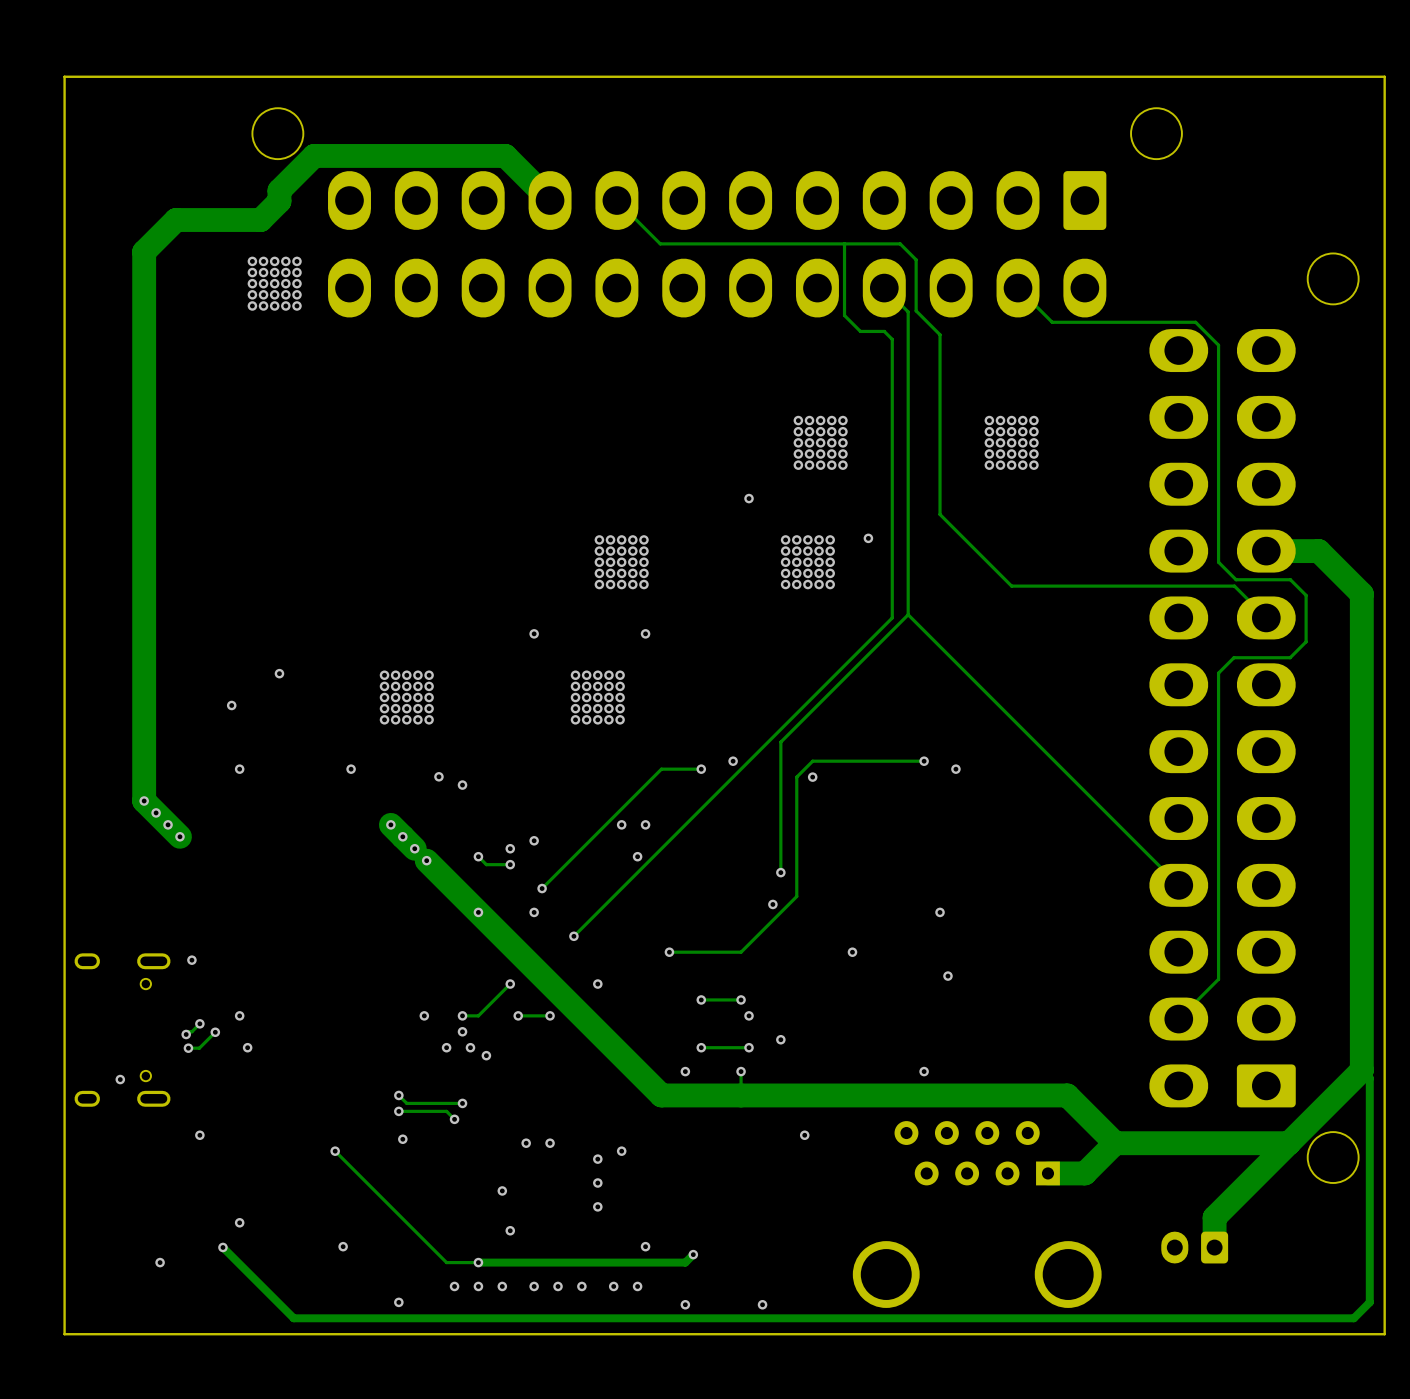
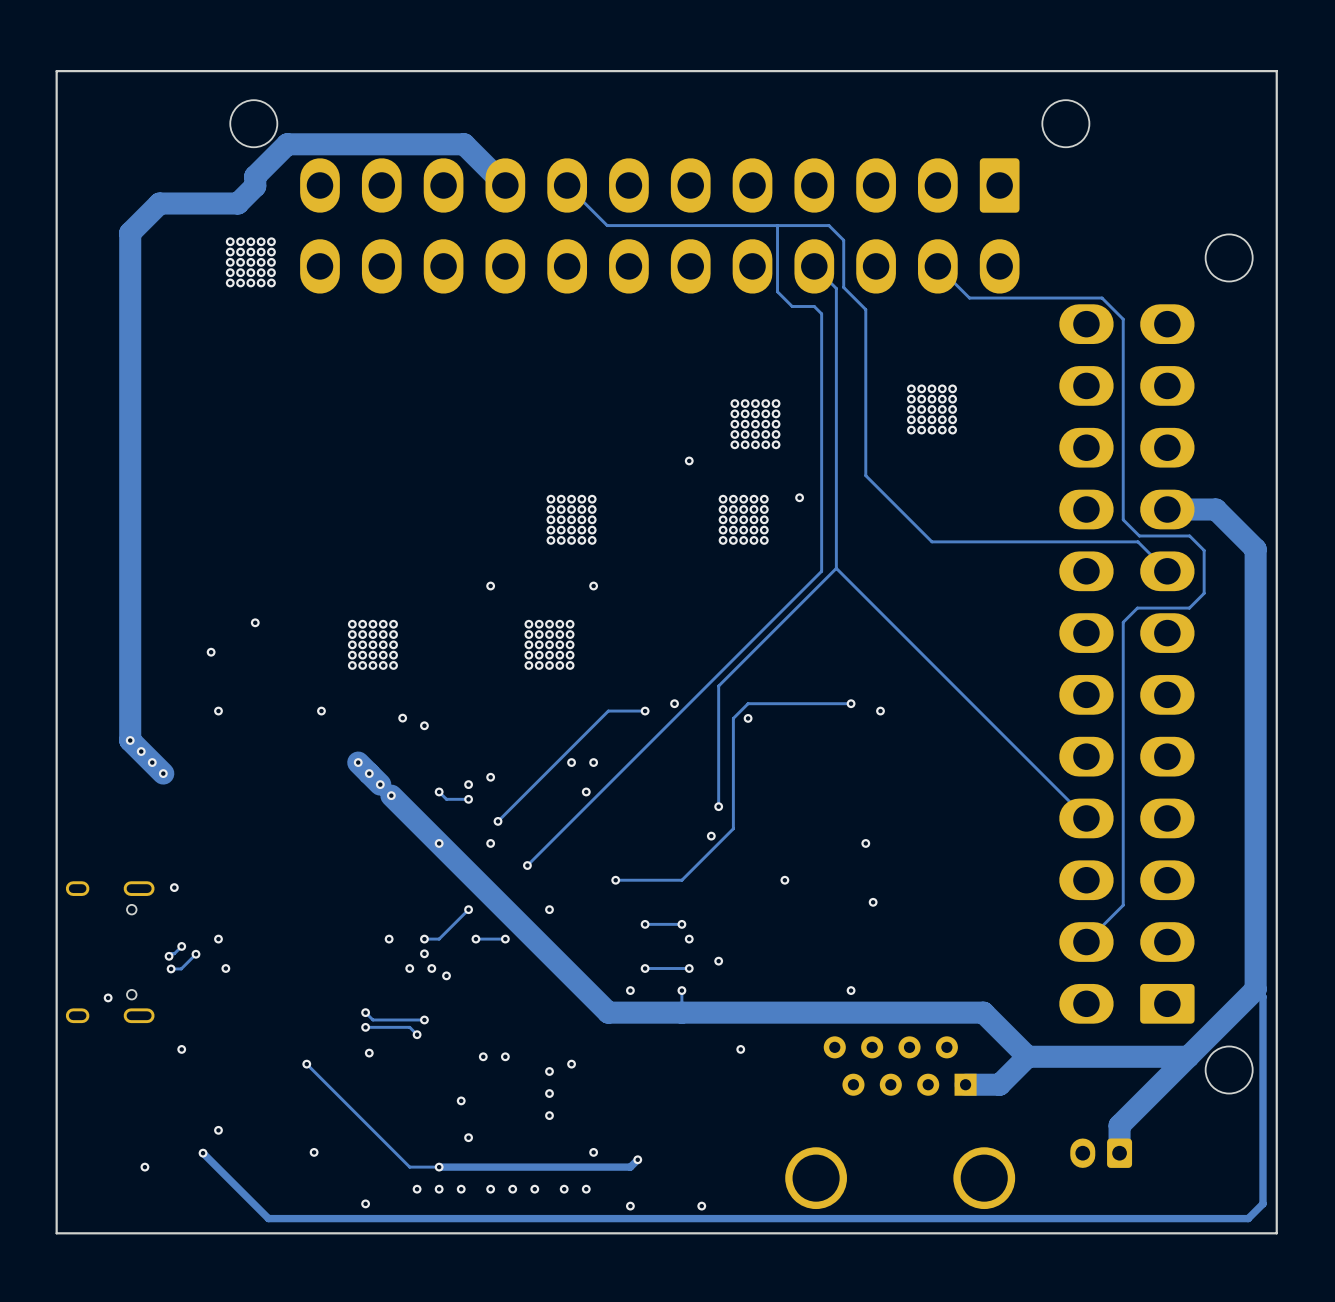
via: (798, 420) -> none
via: (809, 420) -> none
via: (820, 420) -> none
via: (831, 420) -> none
via: (842, 420) -> none
via: (798, 431) -> none
via: (809, 431) -> none
via: (820, 431) -> none
via: (831, 431) -> none
via: (842, 431) -> none
via: none -> (734, 403)
via: none -> (745, 403)
via: none -> (755, 403)
via: none -> (765, 403)
via: none -> (776, 403)
via: (798, 442) -> none
via: (809, 442) -> none
via: (820, 442) -> none
via: (831, 442) -> none
via: (842, 442) -> none
via: none -> (734, 413)
via: none -> (745, 413)
via: none -> (755, 413)
via: none -> (765, 413)
via: none -> (776, 413)
via: (798, 454) -> none
via: (809, 454) -> none
via: (820, 454) -> none
via: (831, 454) -> none
via: (842, 454) -> none
via: none -> (734, 424)
via: none -> (745, 424)
via: none -> (755, 424)
via: none -> (765, 424)
via: none -> (776, 424)
via: (798, 465) -> none
via: (809, 465) -> none
via: (820, 465) -> none
via: (831, 465) -> none
via: (842, 465) -> none
via: none -> (734, 434)
via: none -> (745, 434)
via: none -> (755, 434)
via: none -> (765, 434)
via: none -> (776, 434)
via: none -> (734, 444)
via: none -> (745, 444)
via: none -> (755, 444)
via: none -> (765, 444)
via: none -> (776, 444)

